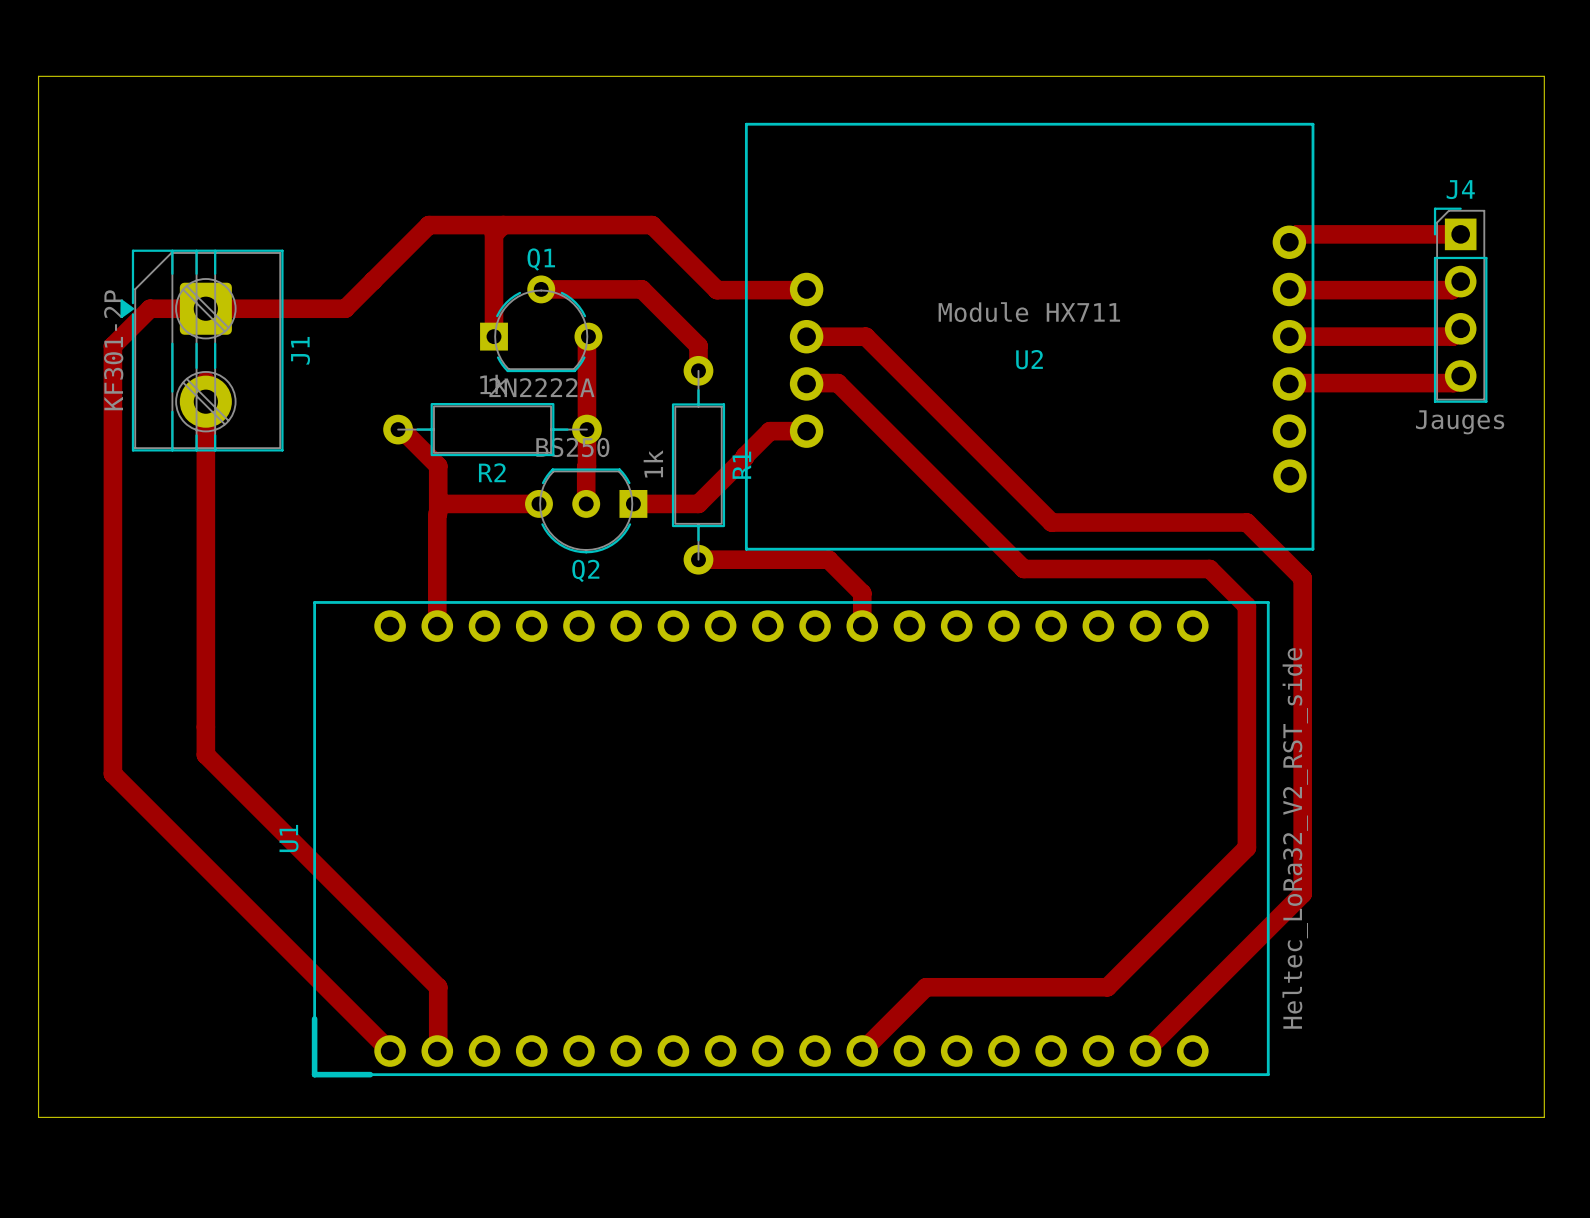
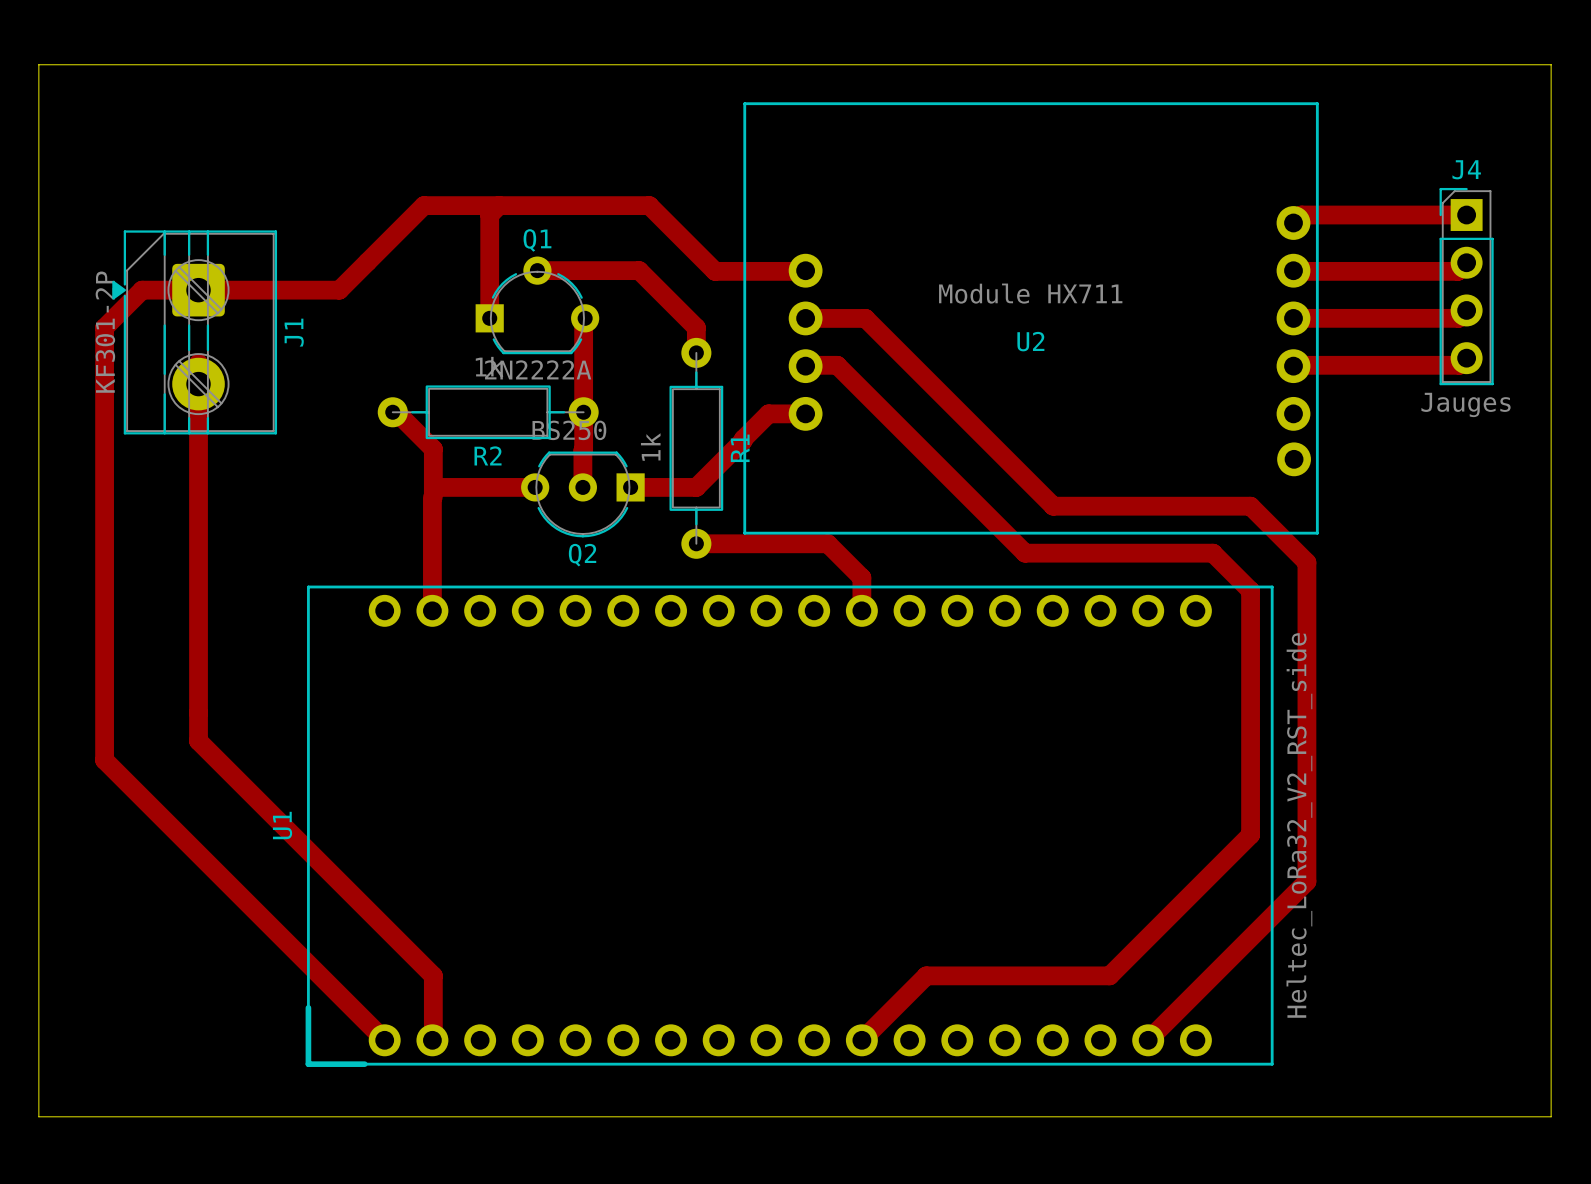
board edge: (1544, 85) (1544, 76) (38, 76) (38, 1117) (1544, 1117) -> (1551, 64) (38, 64) (38, 1116) (1551, 1116) (1551, 1107)

